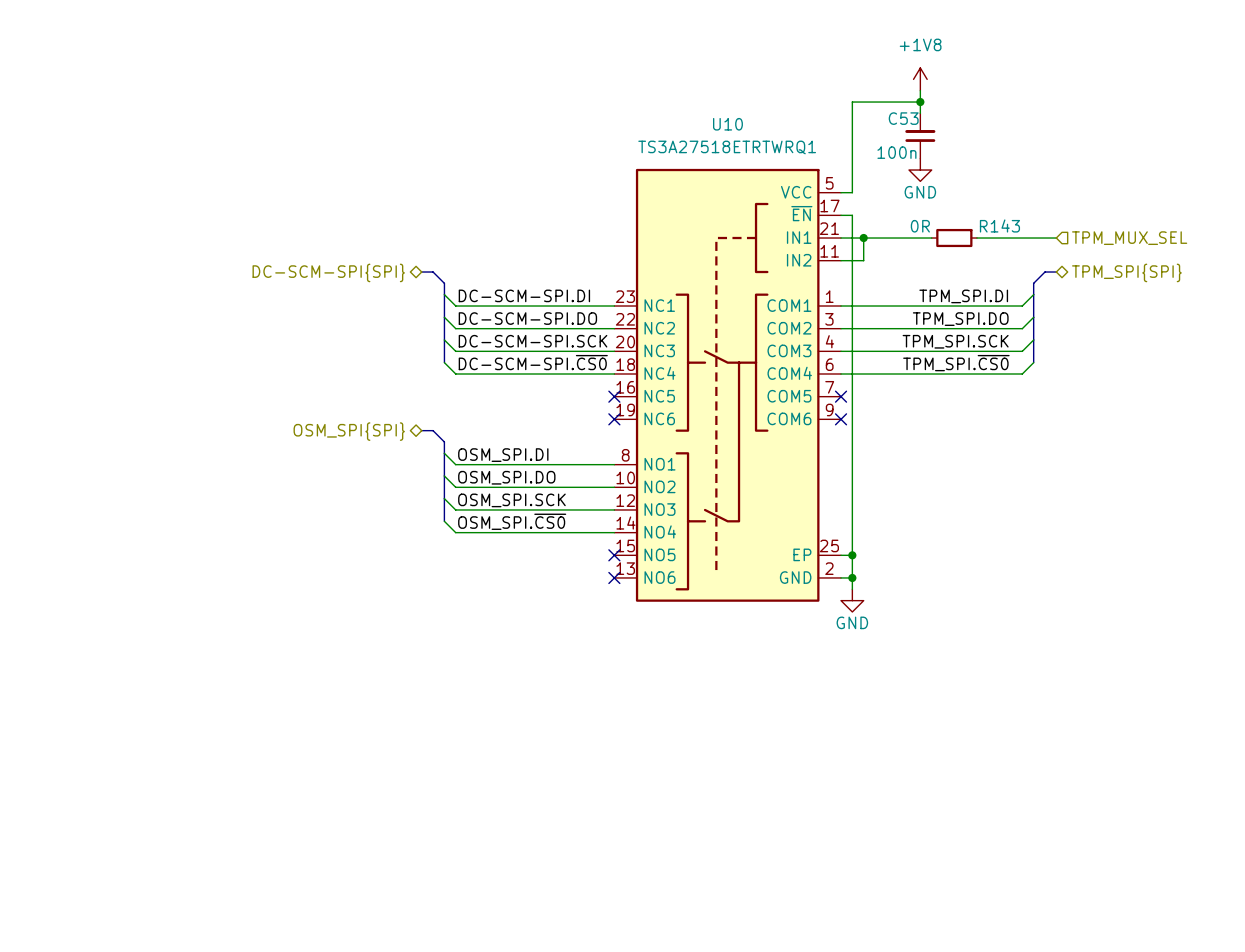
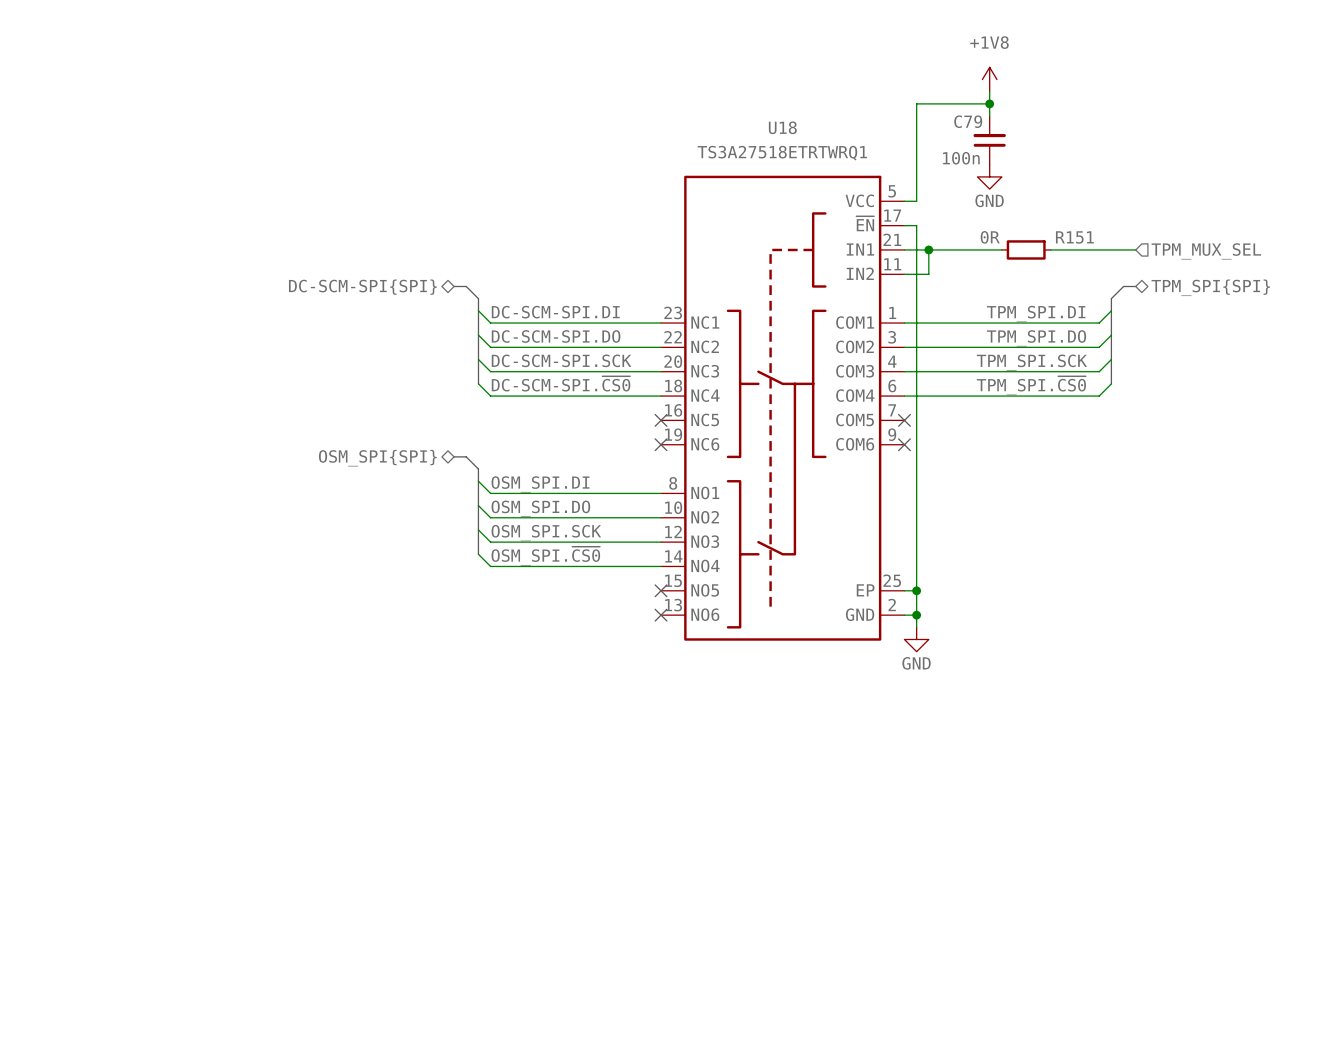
C53 name: C53 (903, 118) -> C79 (968, 121)
U10 name: U10 (727, 124) -> U18 (782, 127)
R143 name: R143 (999, 225) -> R151 (1074, 237)

